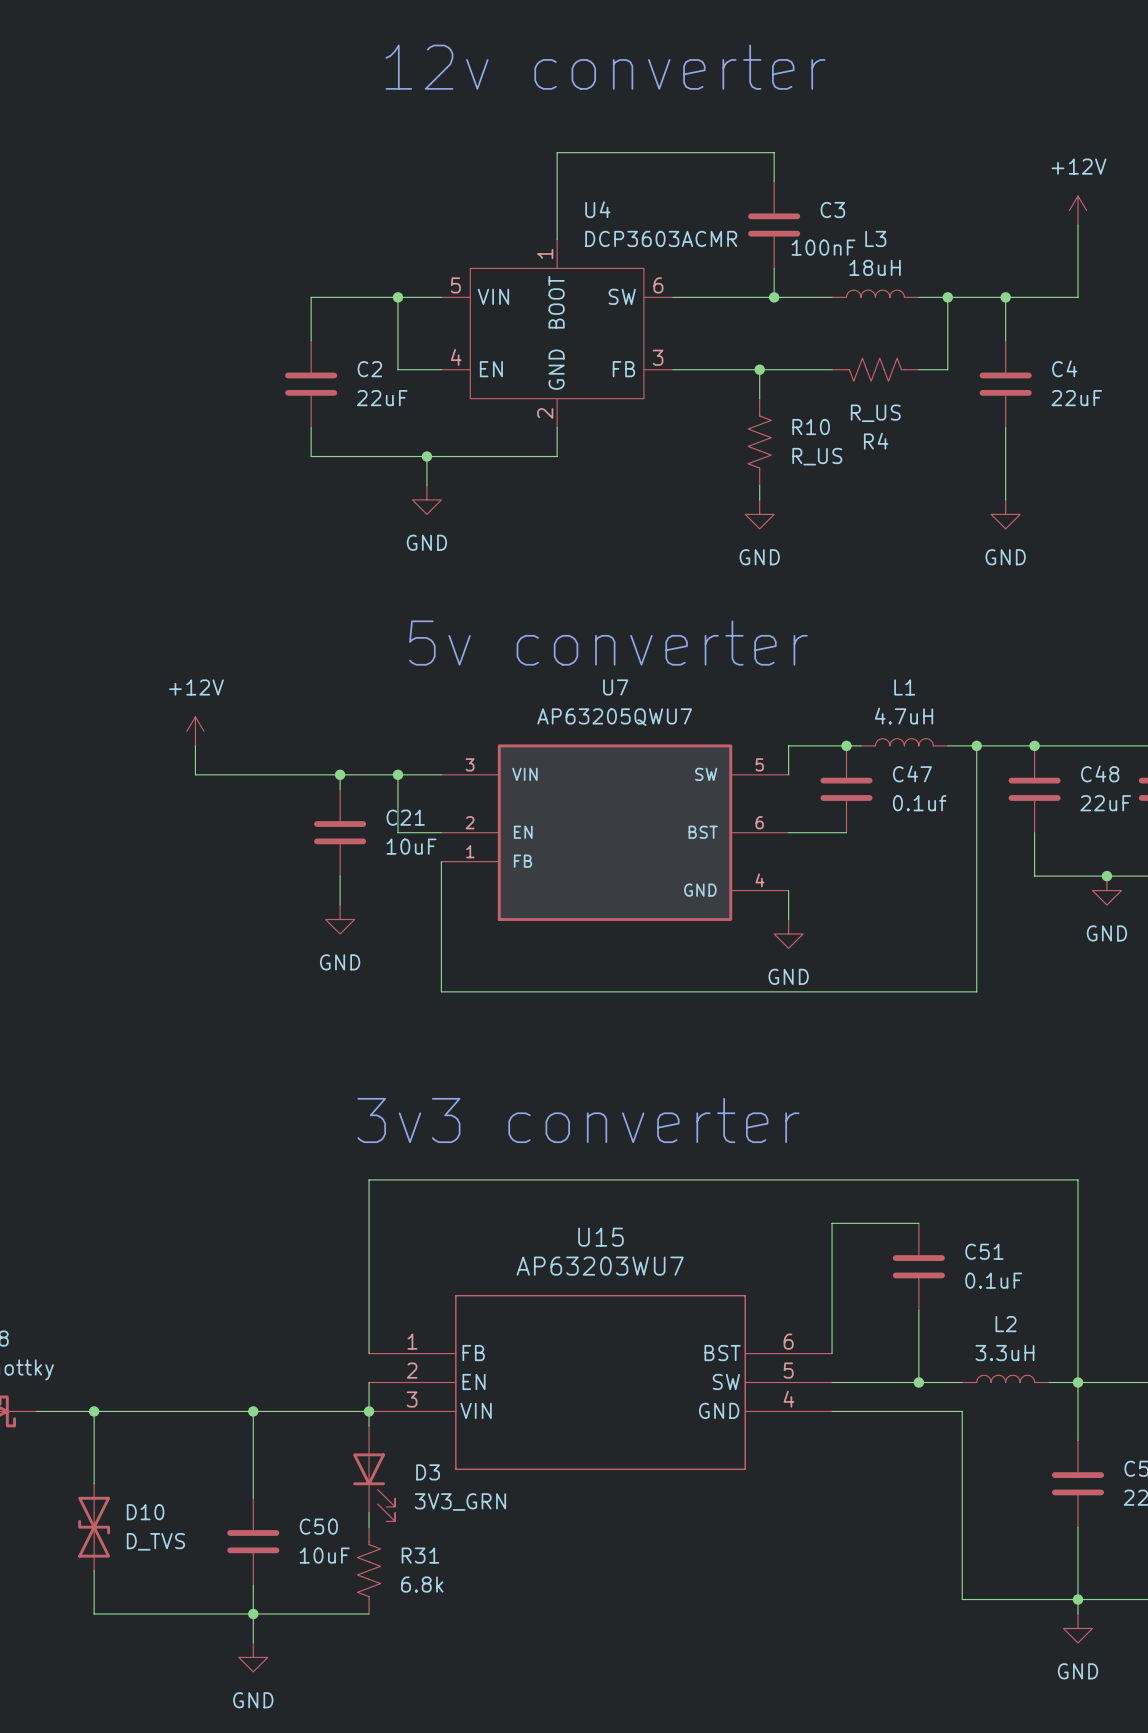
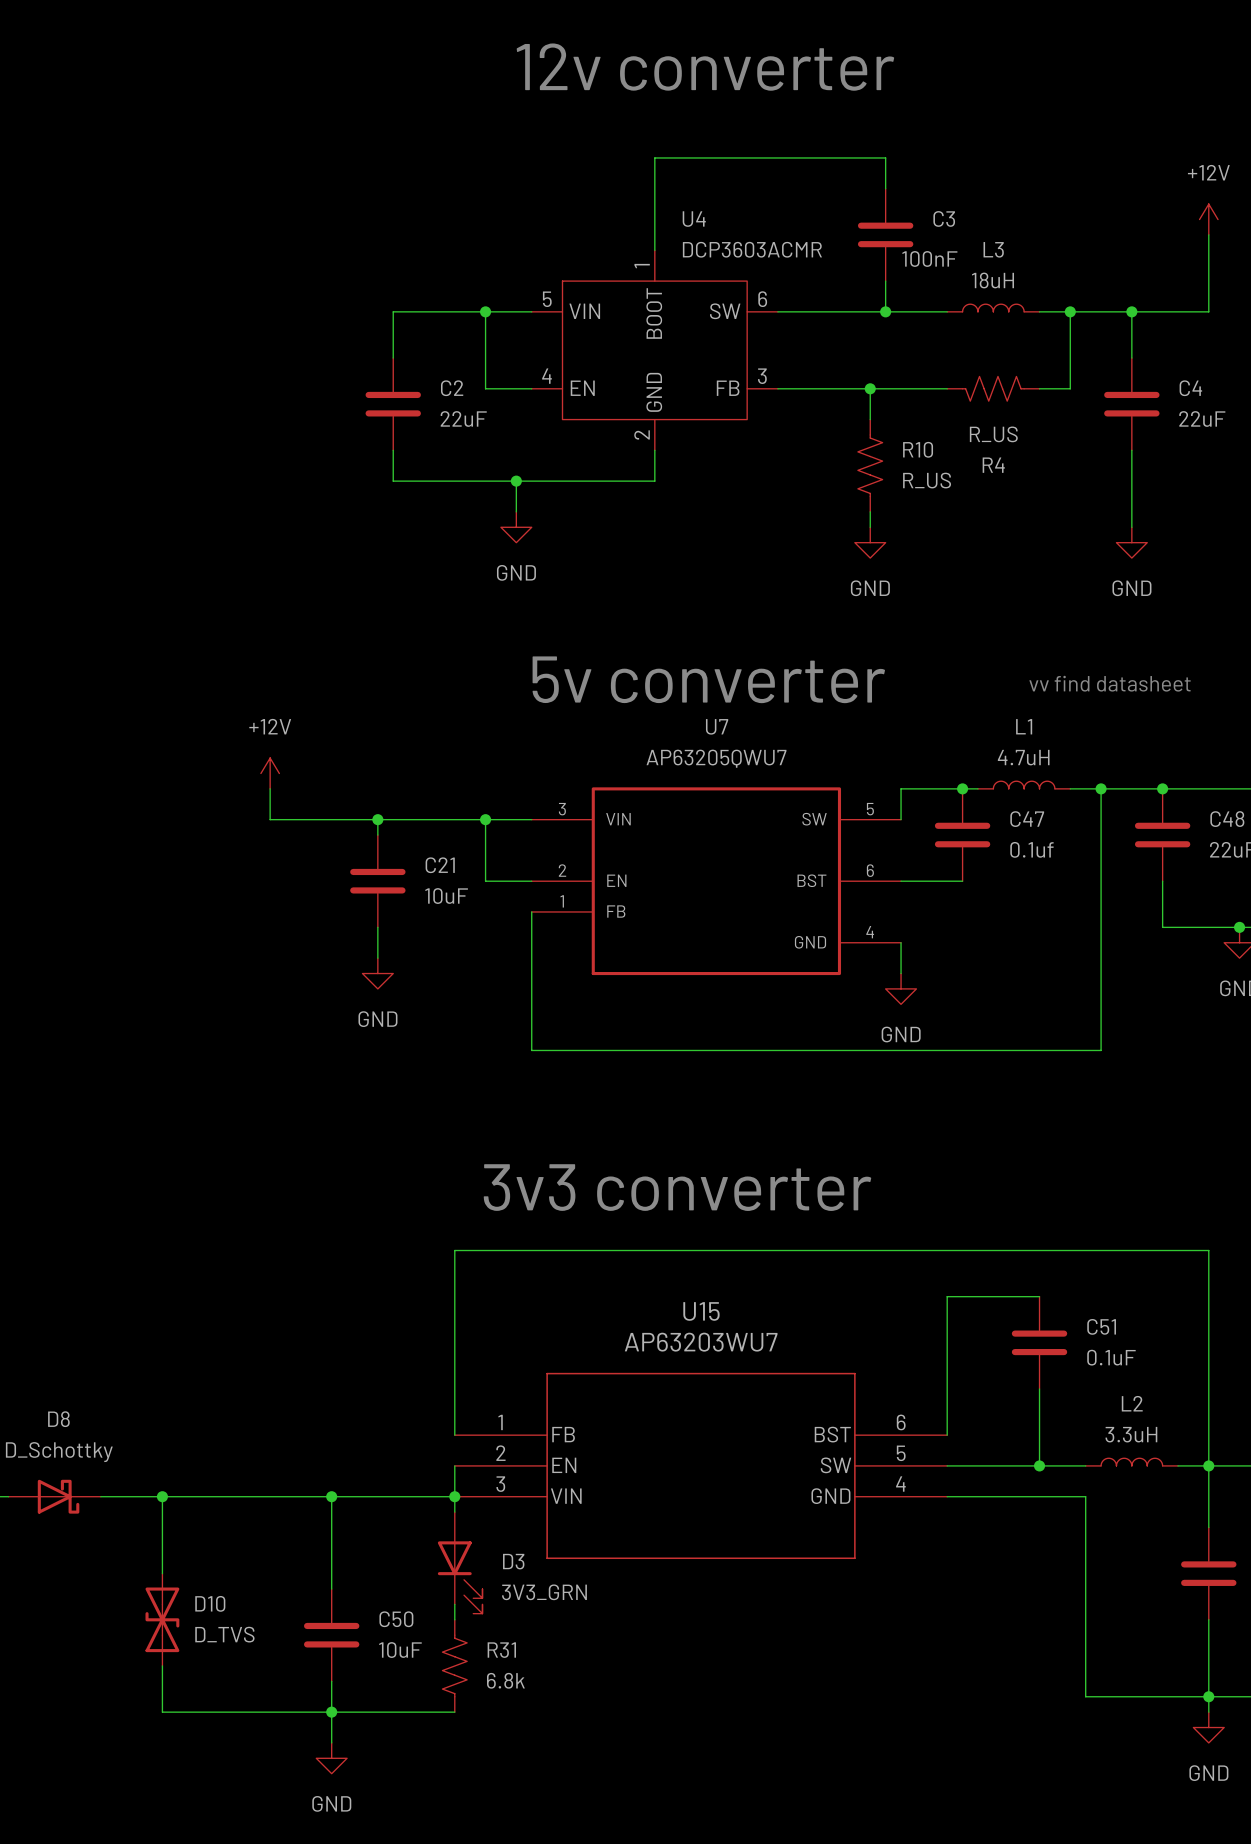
text: none -> vv find datasheet (1110, 683)
wire: (340, 774) (340, 789) -> (377, 819) (377, 835)
junction position: (340, 774) -> (377, 819)
C21 position: (340, 832) -> (377, 881)
wire: (340, 876) (340, 905) -> (377, 927) (377, 958)
power symbol position: GND (340, 919) -> GND (377, 973)

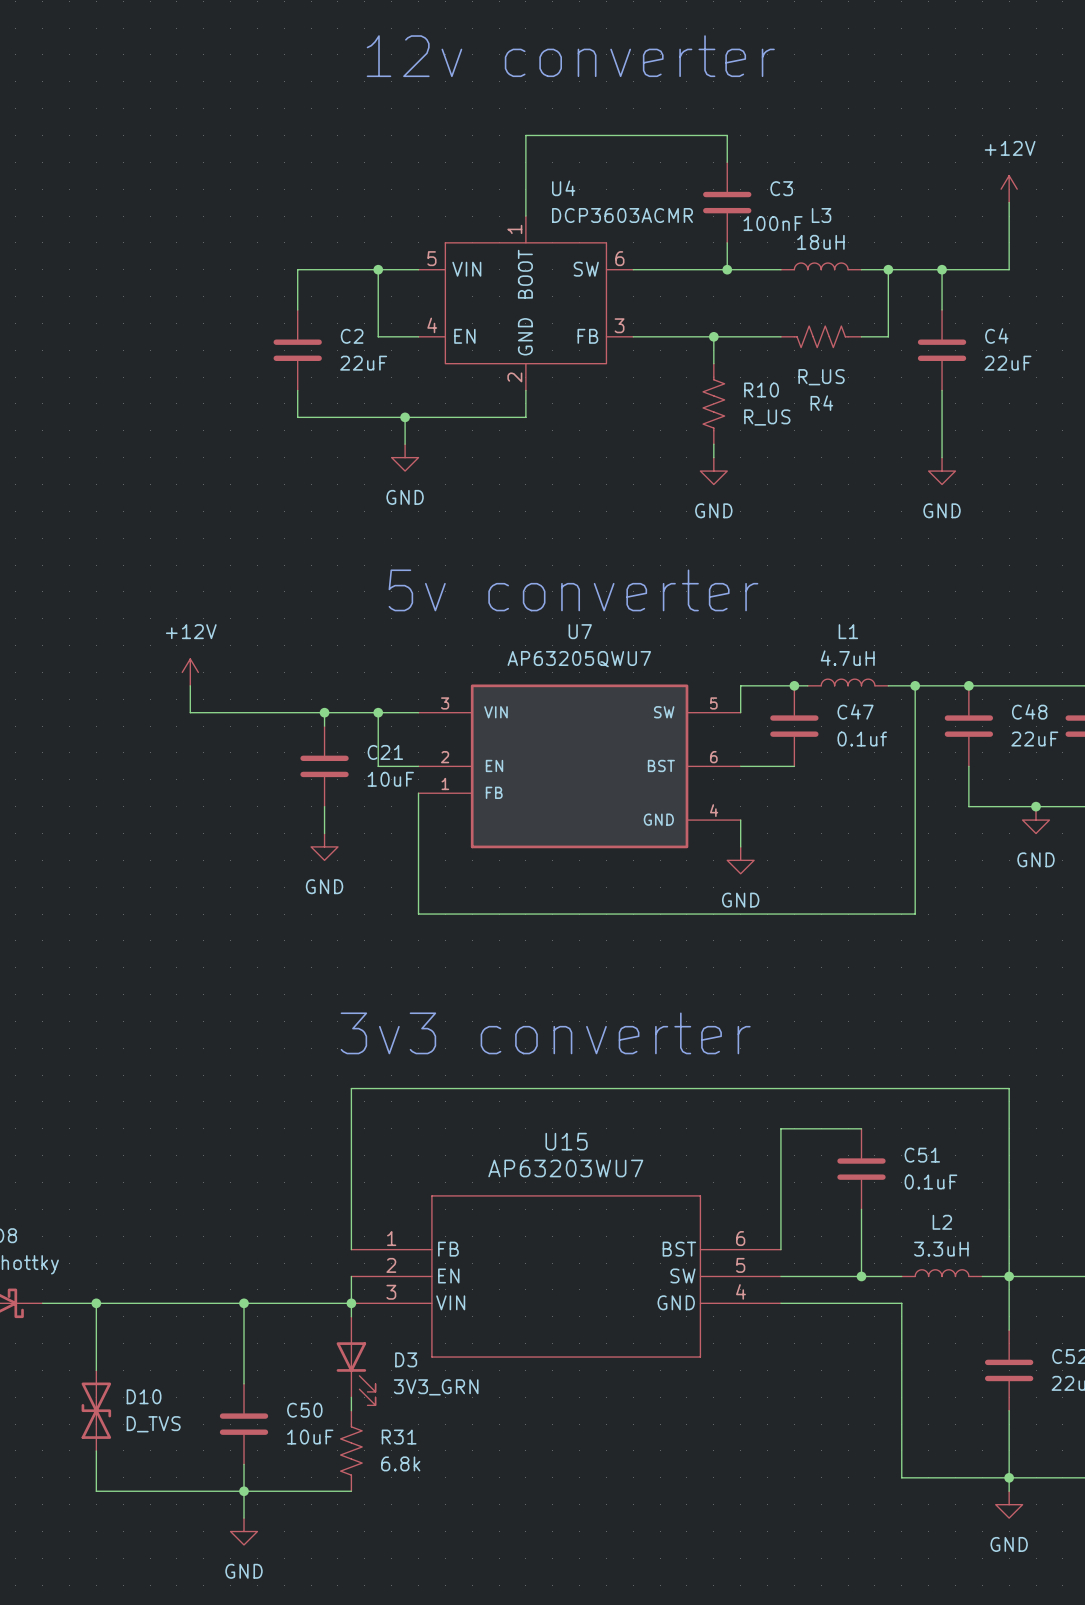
text: vv find datasheet (1110, 683) -> none
wire: (377, 819) (377, 835) -> (324, 712) (324, 726)
junction position: (377, 819) -> (324, 712)
C21 position: (377, 881) -> (324, 766)
wire: (377, 927) (377, 958) -> (324, 806) (324, 833)
power symbol position: GND (377, 973) -> GND (324, 846)

